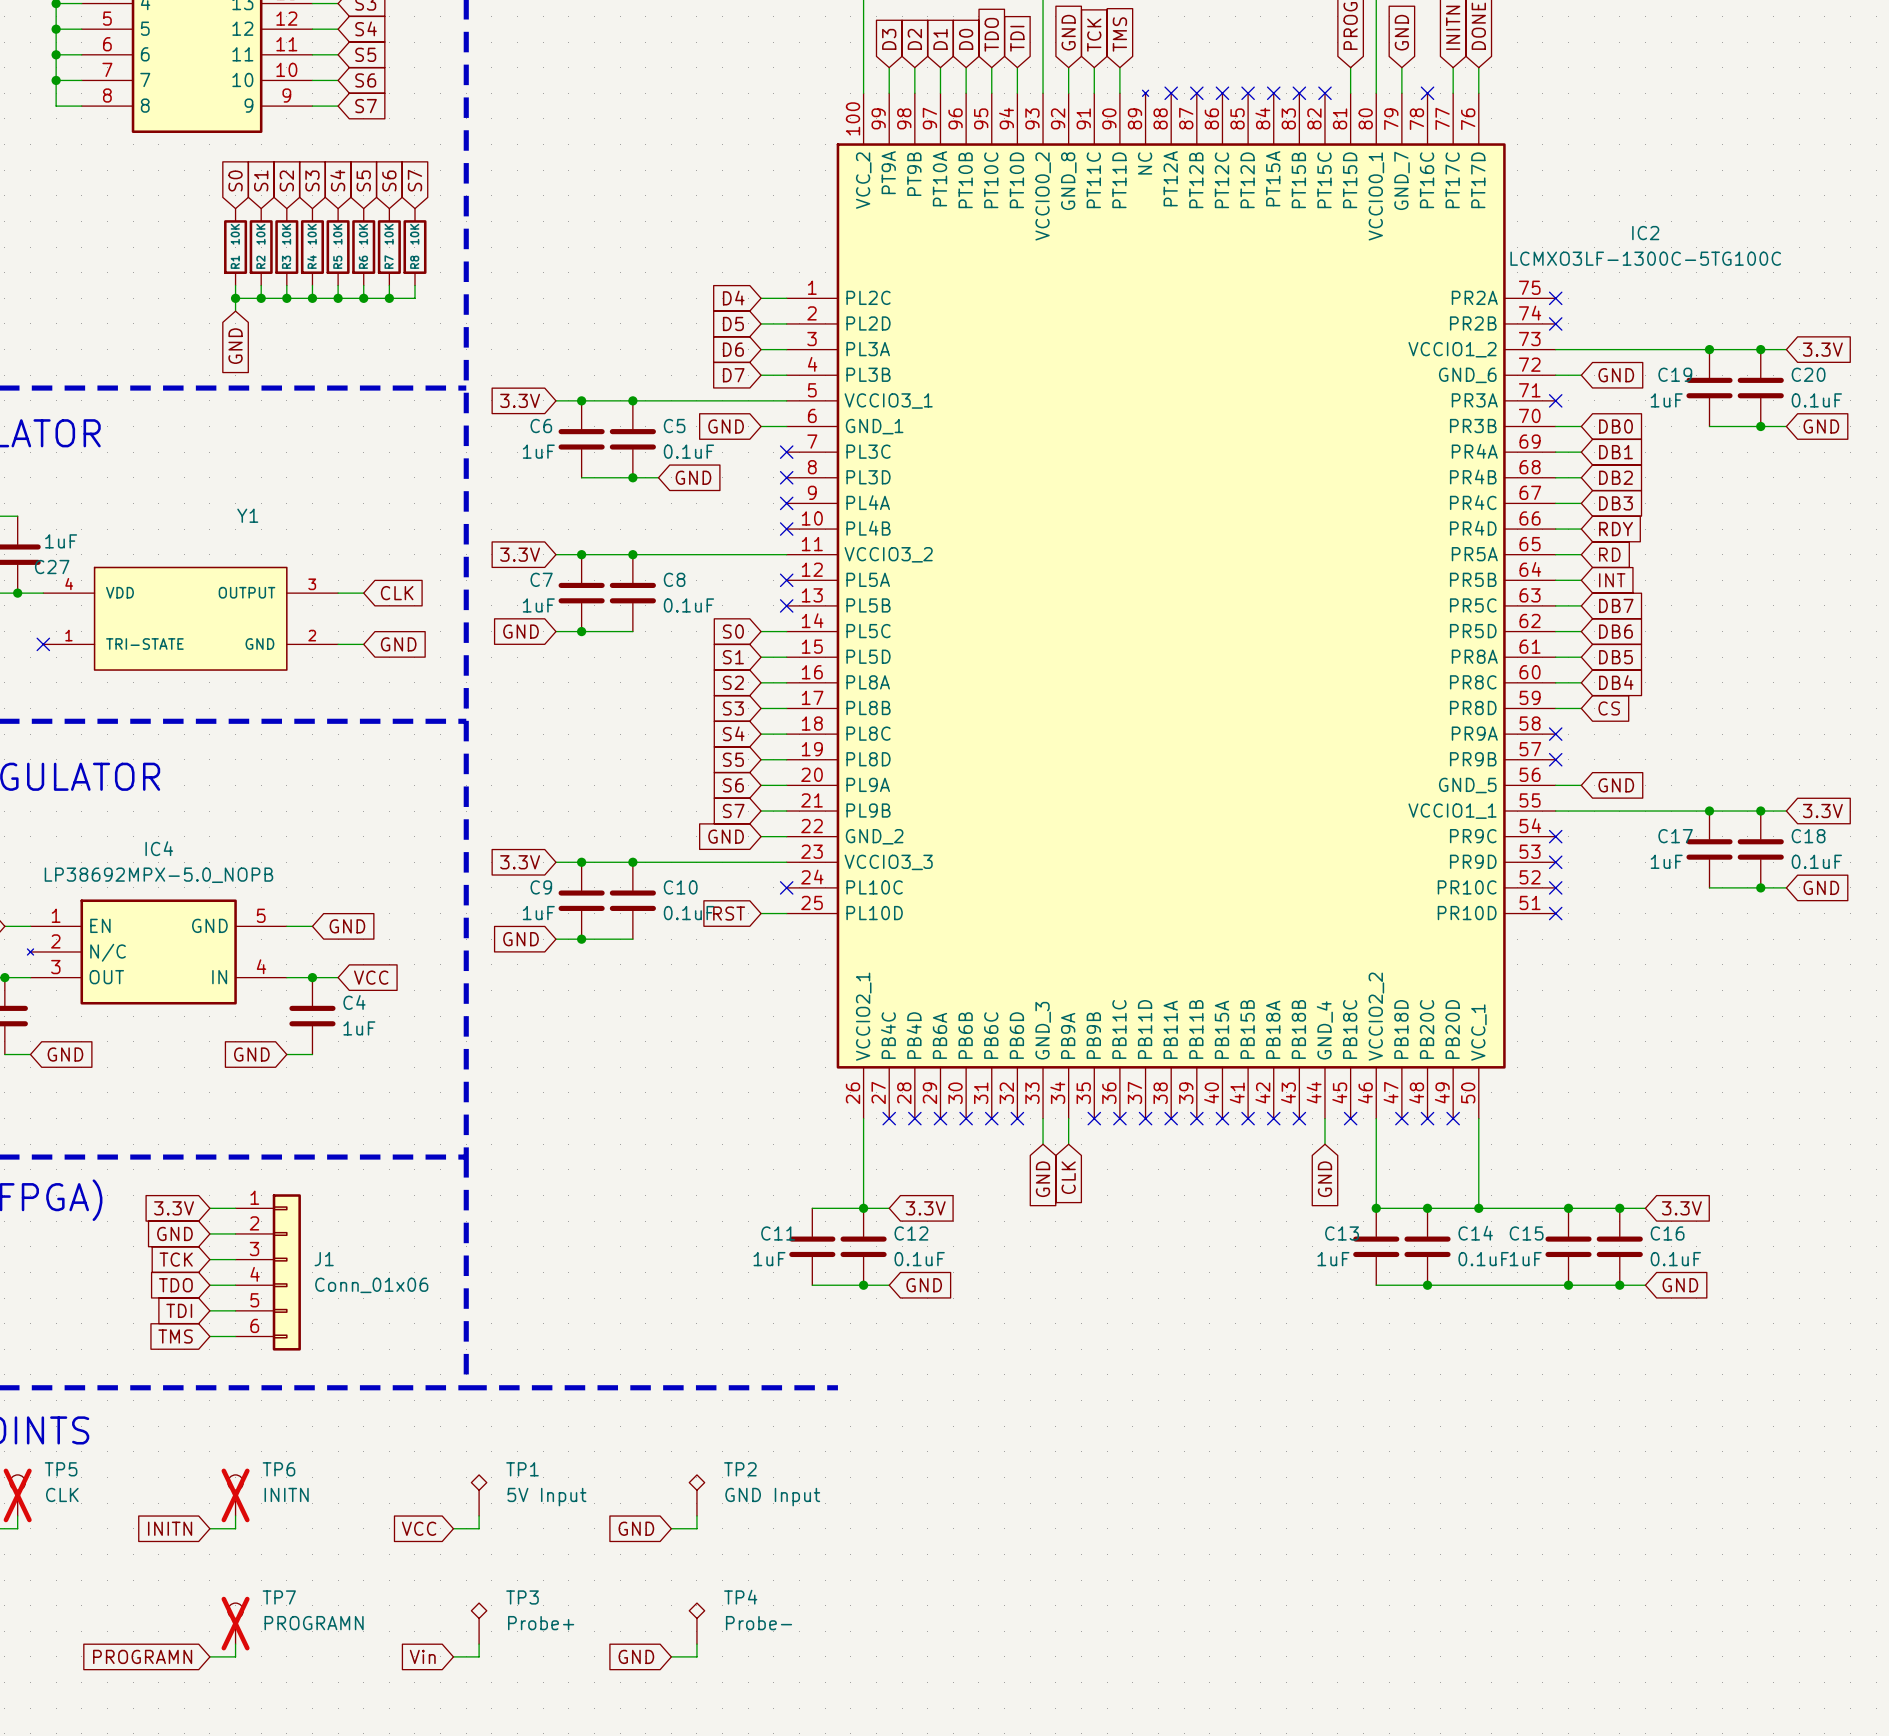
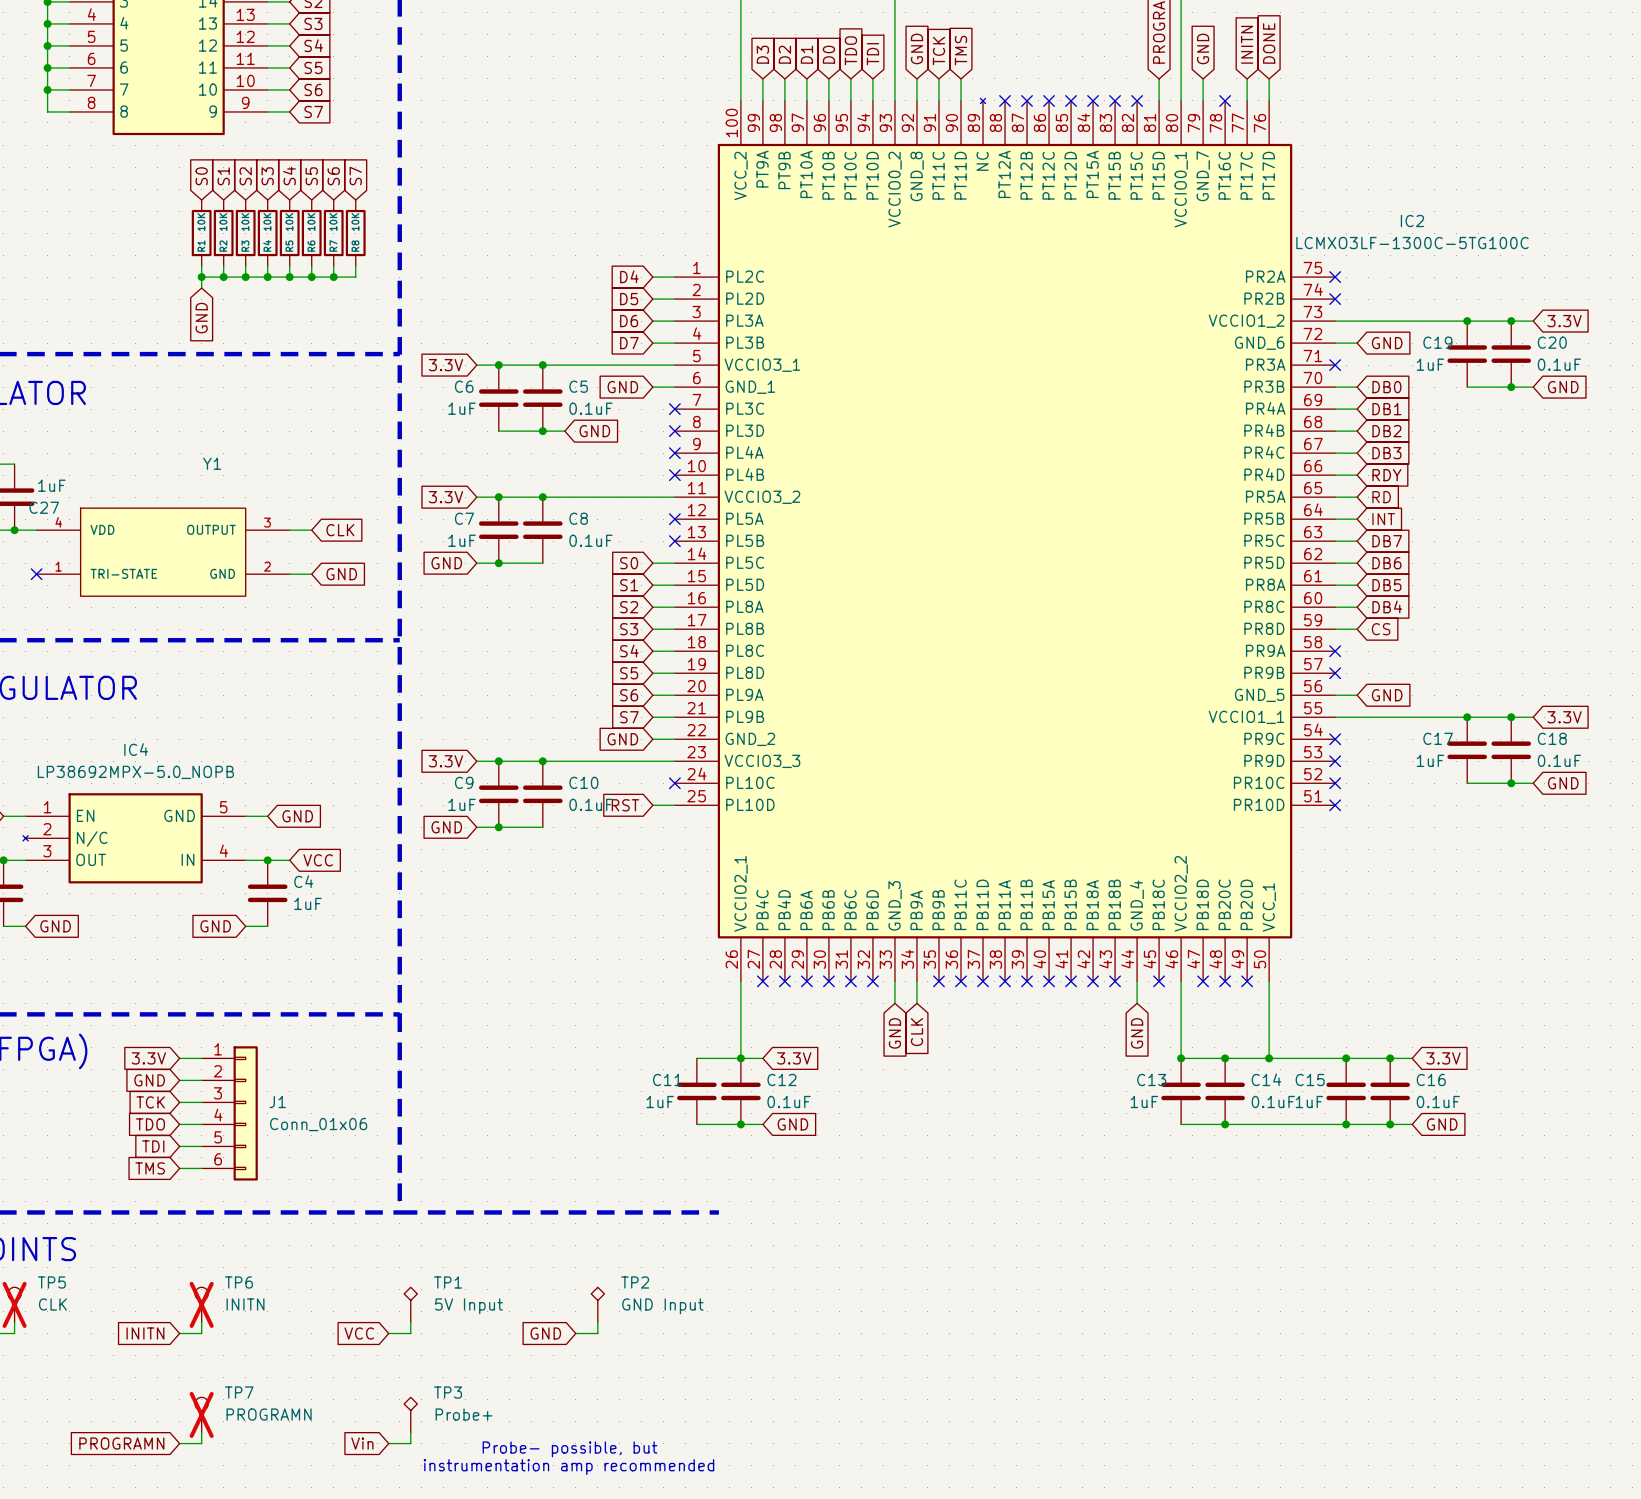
TP4: Probe- (696, 1623) -> none
wire: (696, 1644) (696, 1656) (671, 1656) -> none
global label: GND (636, 1656) -> none
text: none -> Probe- possible, but (570, 1449)
text: none -> instrumentation amp recommended (568, 1467)

